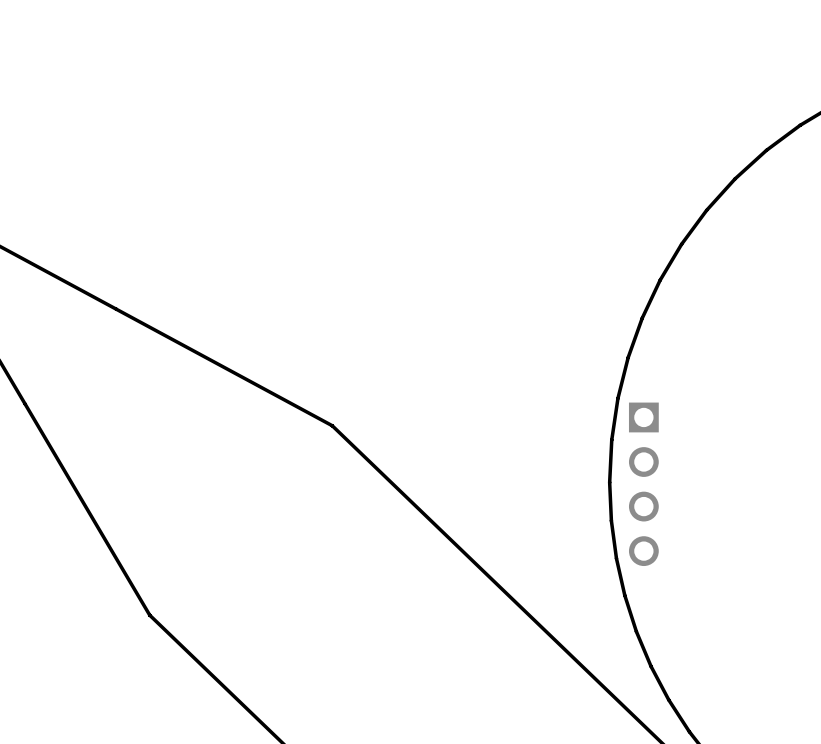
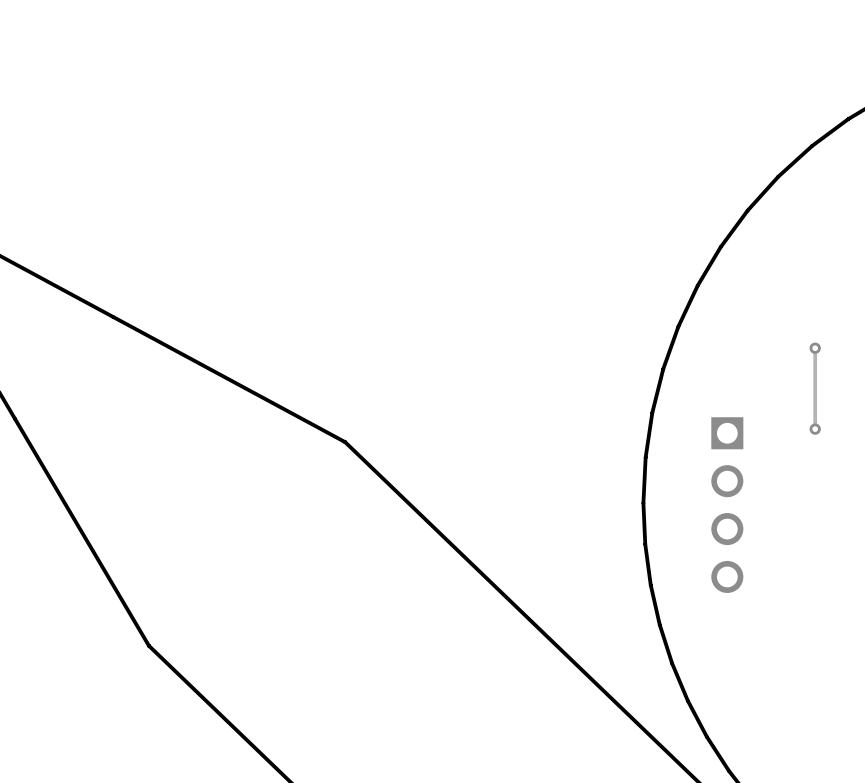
track: none -> (815, 348) (815, 429)
via: none -> (815, 348)
via: none -> (815, 429)
part position: (643, 484) -> (727, 505)

